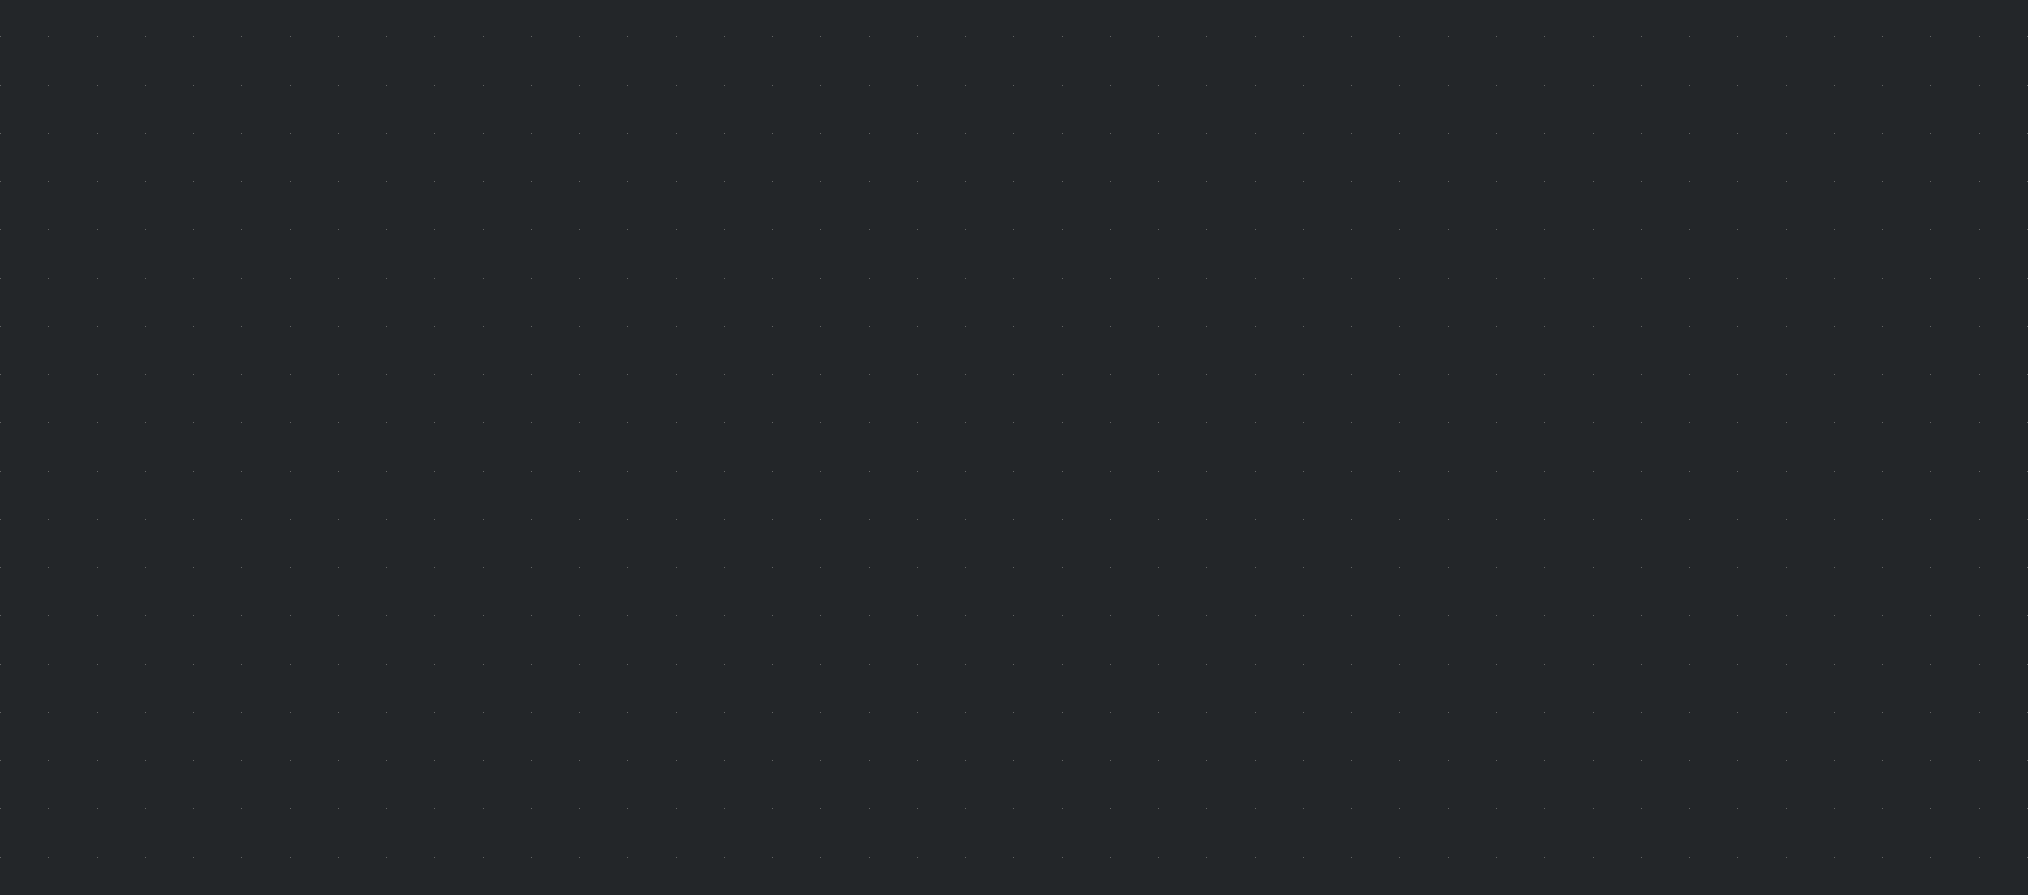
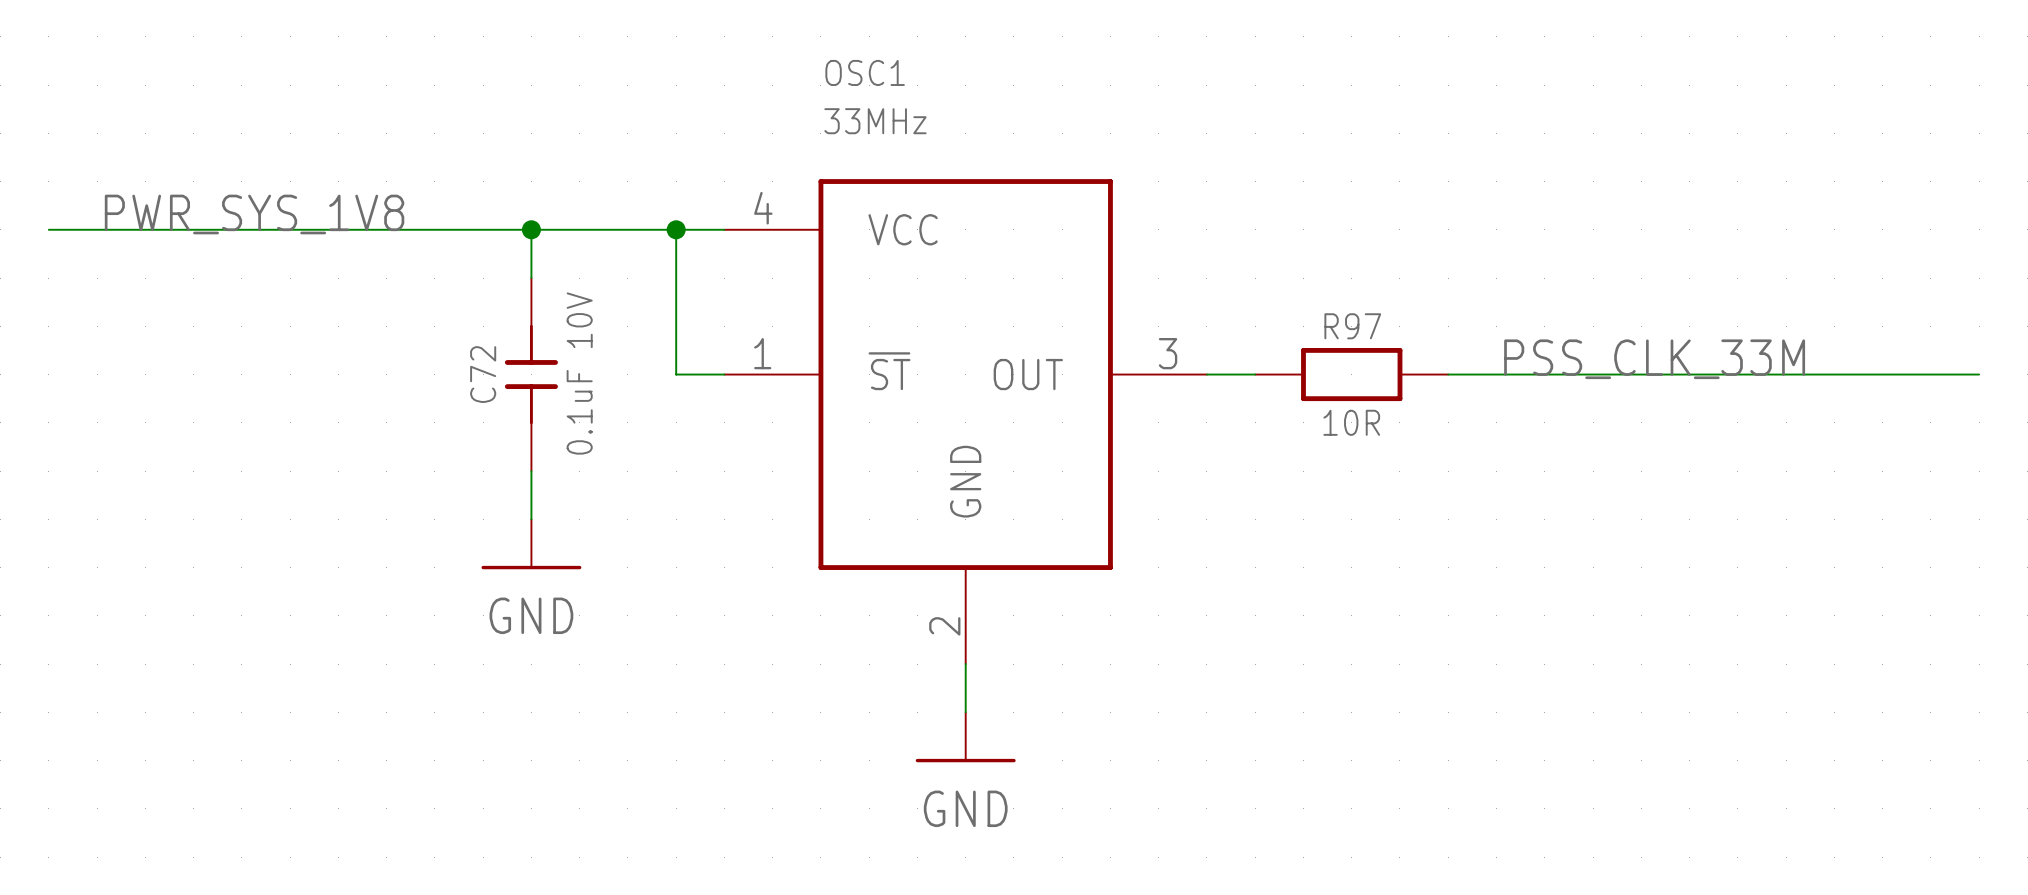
label: none -> PWR_SYS_1V8 (254, 214)
wire: none -> (48, 229) (724, 229)
wire: none -> (531, 229) (531, 278)
junction: none -> (531, 229)
wire: none -> (676, 229) (676, 374) (724, 374)
junction: none -> (676, 229)
label: none -> PSS_CLK_33M (1654, 359)
C72: none -> 0.1uF 10V (531, 374)
wire: none -> (1206, 374) (1255, 374)
R97: none -> 10R (1351, 374)
wire: none -> (1448, 374) (1979, 374)
OSC1: none -> 33MHz (965, 421)
wire: none -> (531, 471) (531, 519)
power symbol: none -> GND (531, 544)
wire: none -> (965, 664) (965, 712)
power symbol: none -> GND (965, 737)

